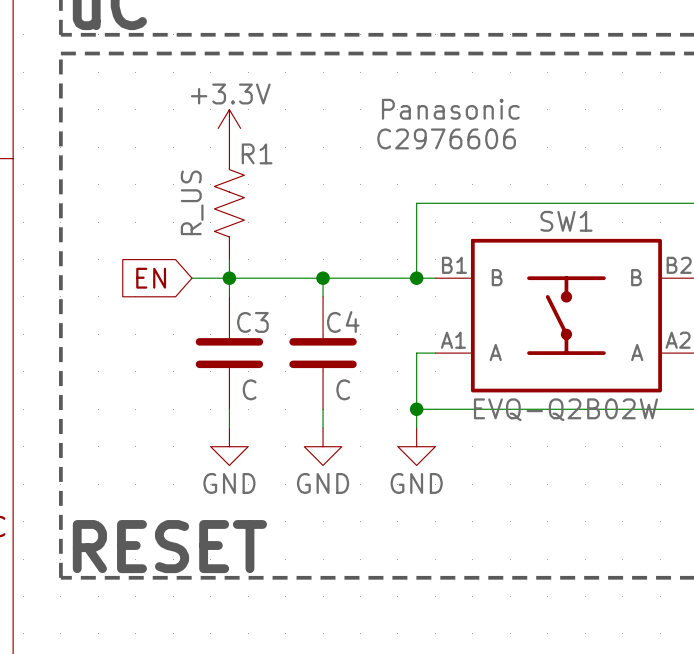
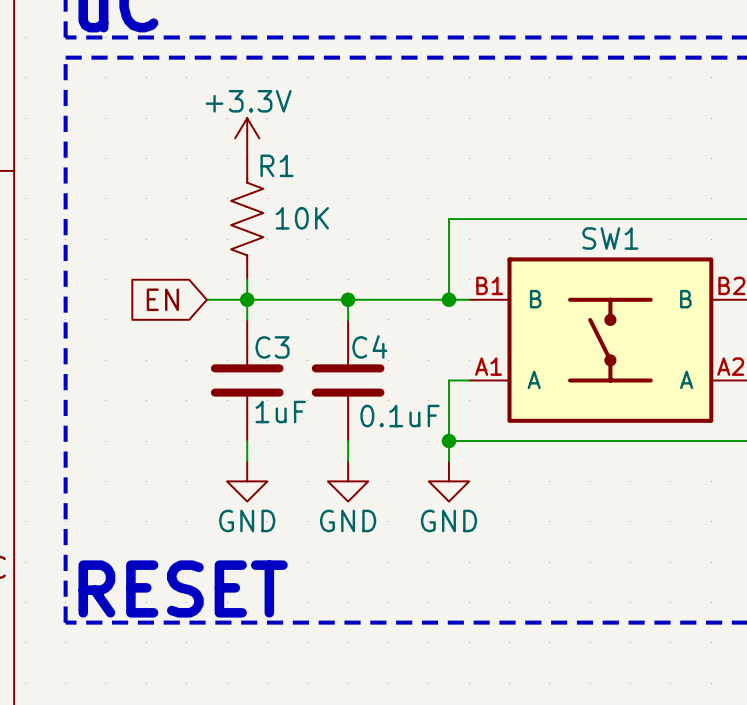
SW1 text: Panasonic (450, 109) -> none
SW1 text: C2976606 (446, 138) -> none
R1 value: R_US (192, 202) -> 10K (302, 218)
C3 value: C (249, 389) -> 1uF (280, 412)
C4 value: C (343, 389) -> 0.1uF (400, 416)
SW1 value: EVQ-Q2B02W (565, 409) -> none

